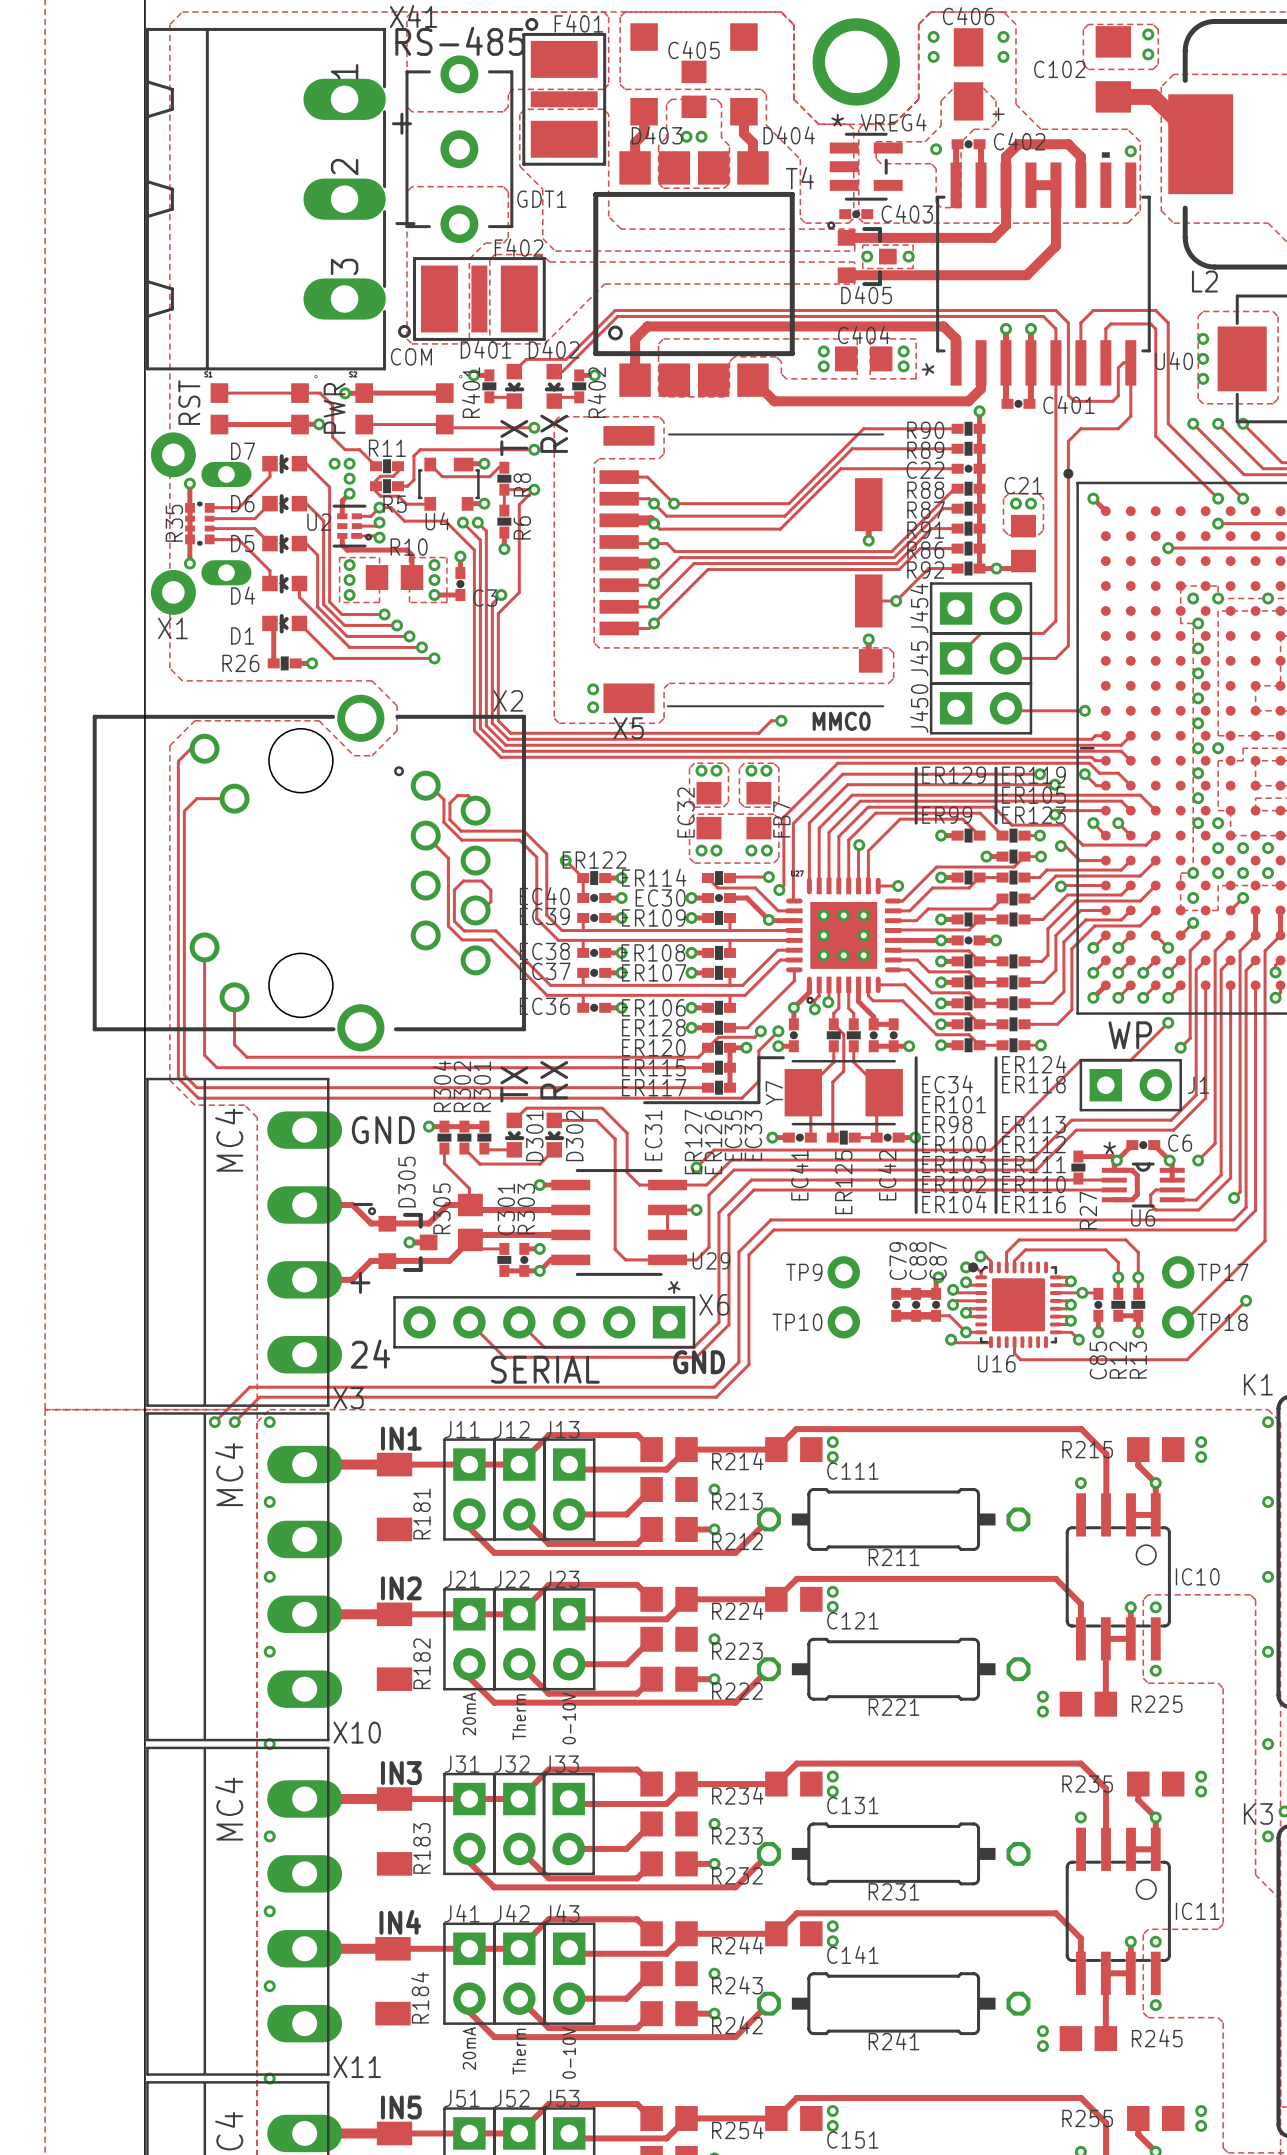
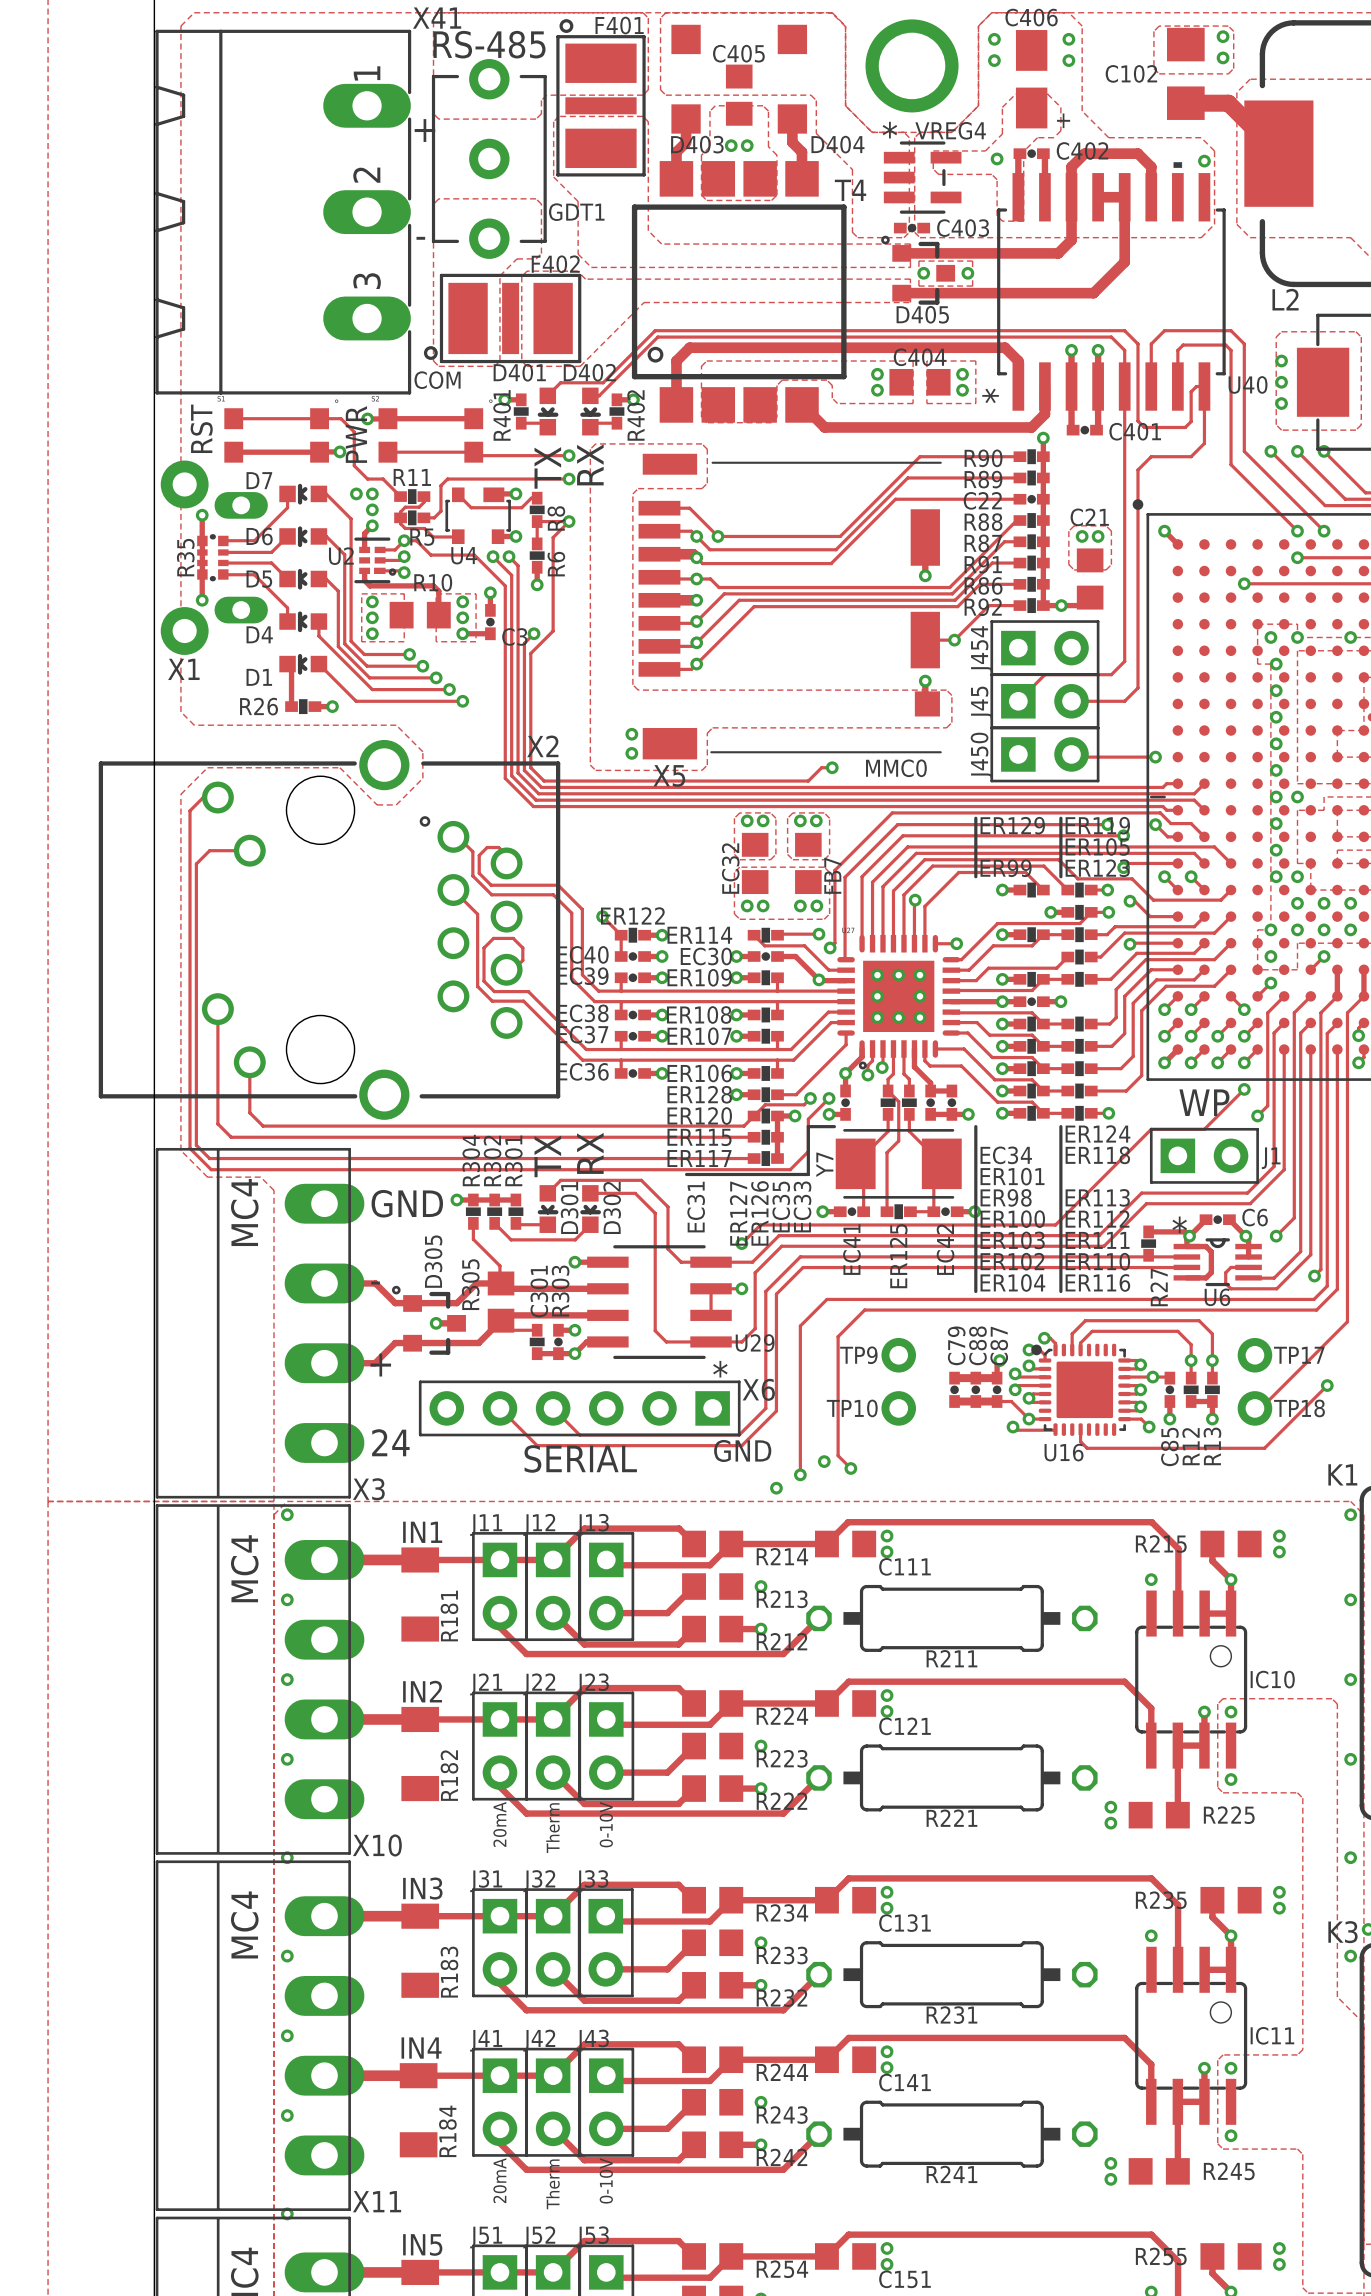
track: (776, 1219) (770, 1219) (738, 1251) (738, 1362) (713, 1387) (249, 1387) (214, 1422) -> (826, 1299) (800, 1326) (800, 1474)
track: (811, 1229) (773, 1229) (748, 1254) (748, 1364) (716, 1397) (259, 1397) (234, 1422) -> (864, 1310) (838, 1336) (838, 1455) (850, 1468)
via: none -> (824, 1461)
via: none -> (850, 1468)
via: none -> (800, 1474)
via: none -> (776, 1488)
via: (214, 1422) -> none
via: (234, 1422) -> none

